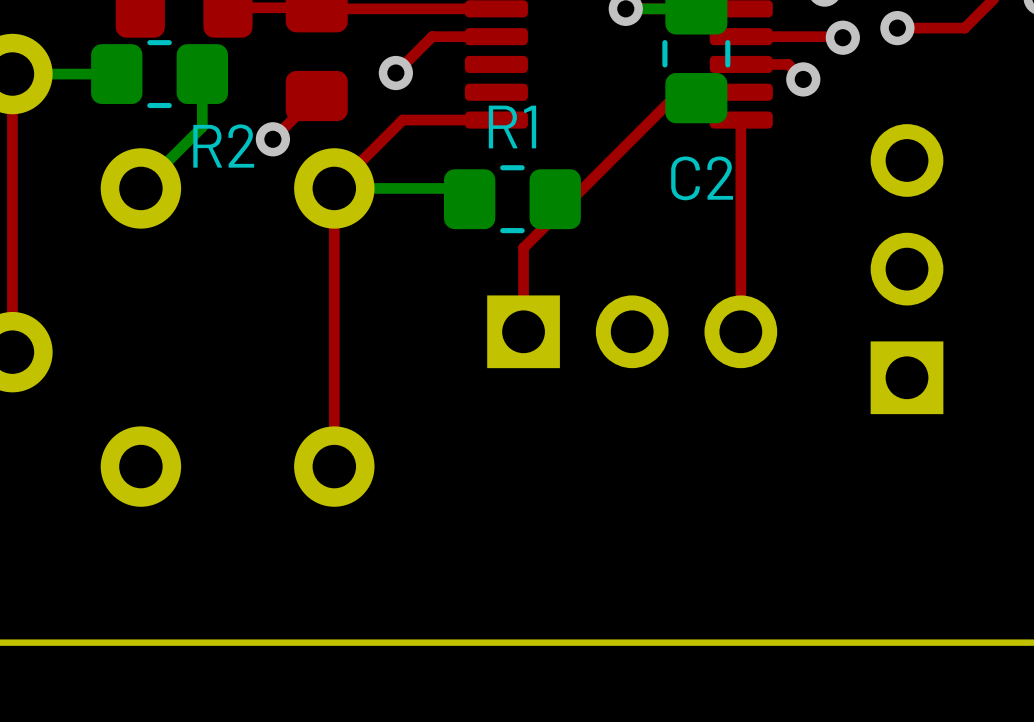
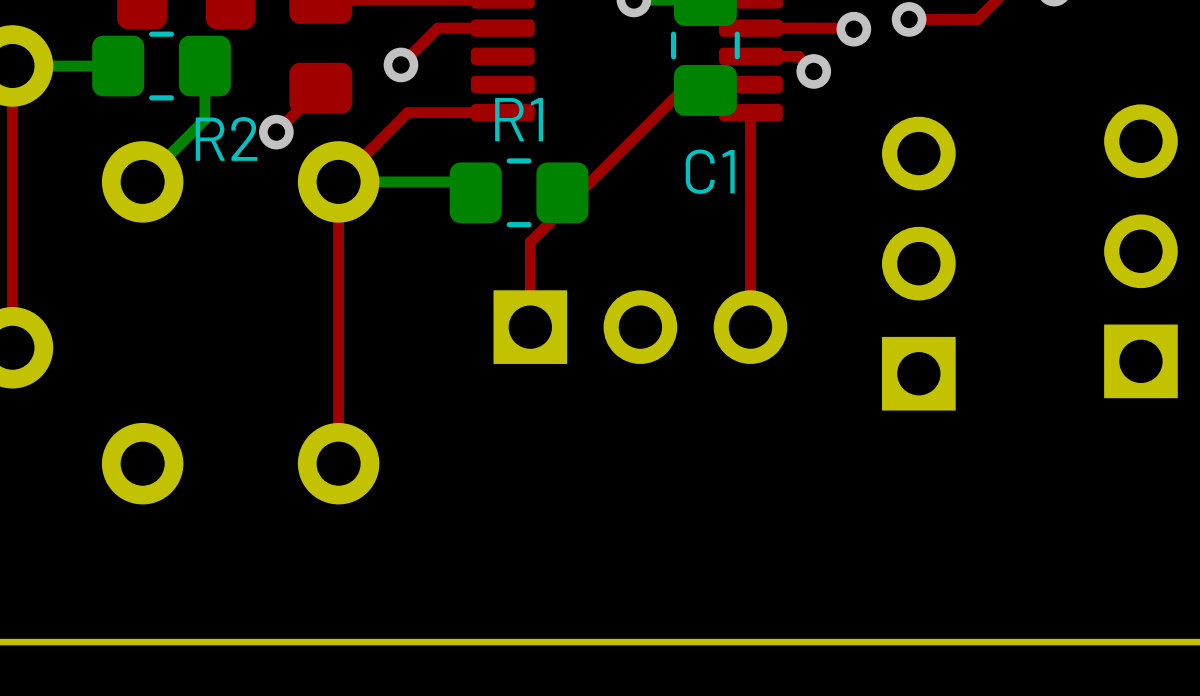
C2 name: C2 (702, 178) -> C1 (710, 171)

